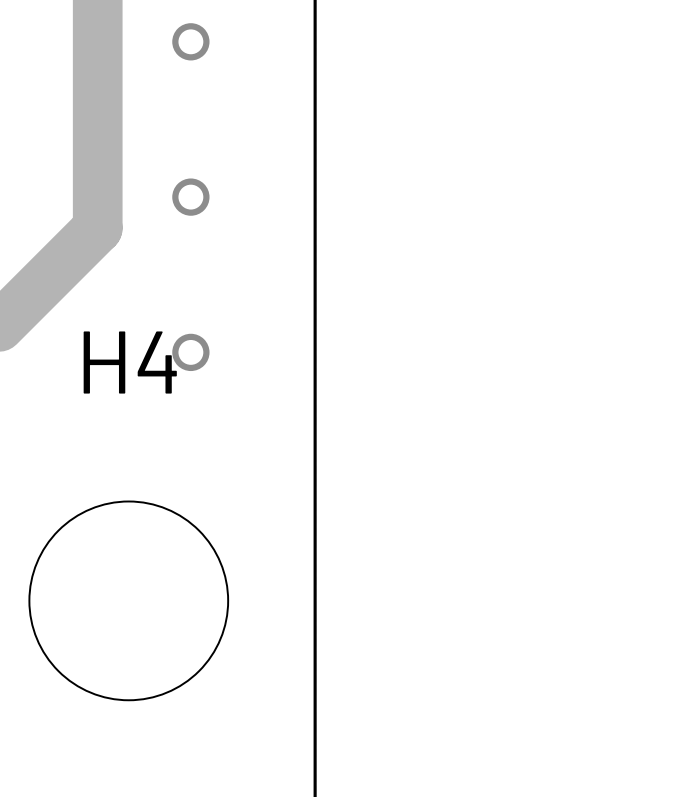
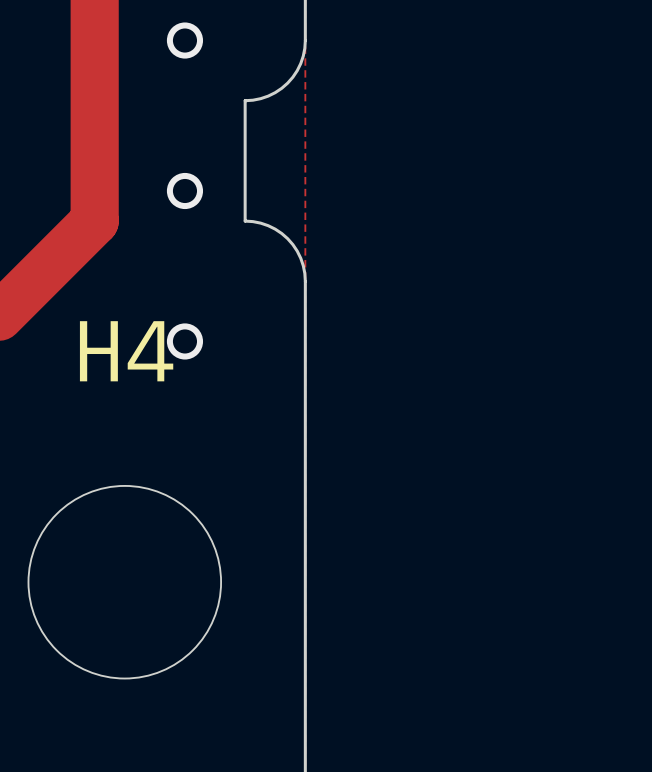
board edge: (315, 41) (315, 290) -> (305, 40) (300, 63) (287, 83) (268, 96) (245, 100) (245, 221) (268, 225) (287, 238) (300, 258) (305, 281)

